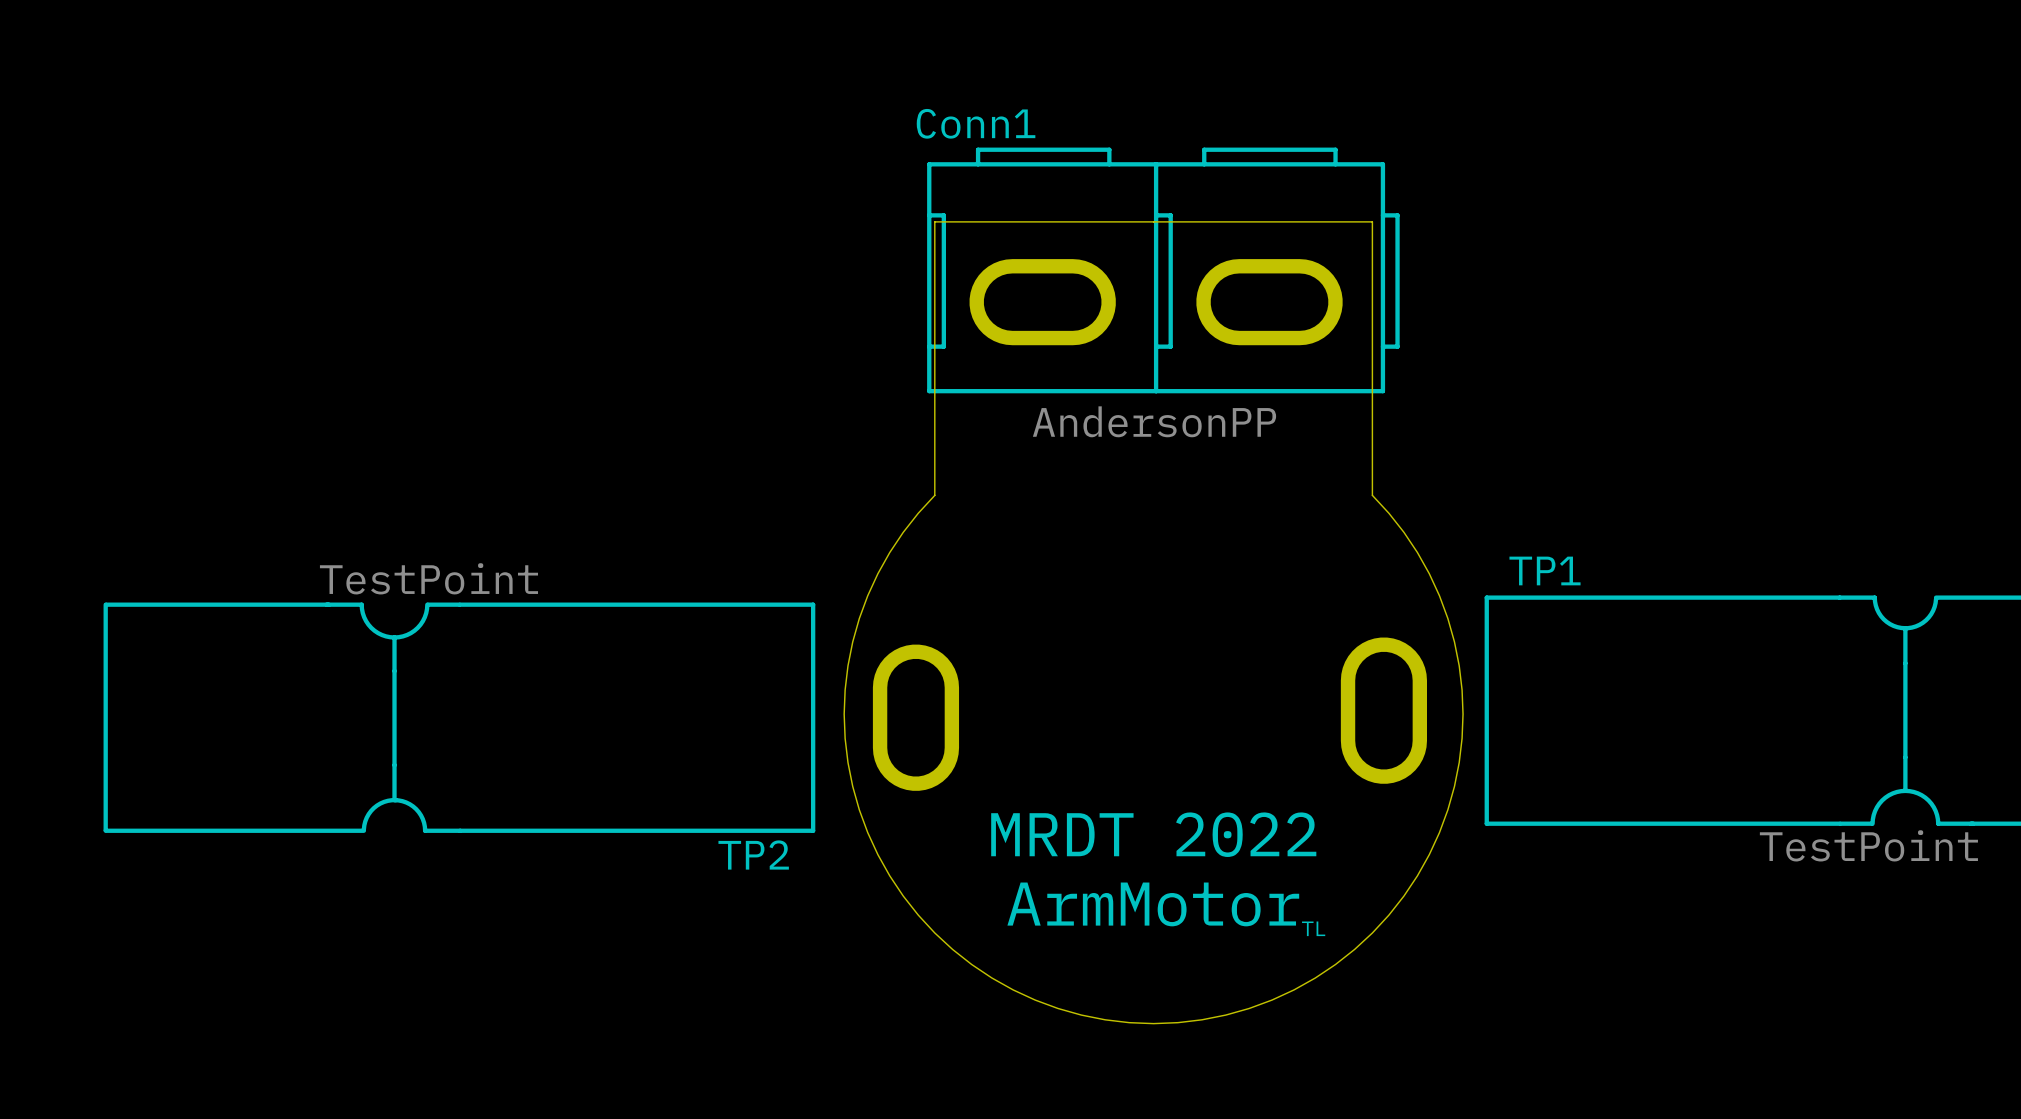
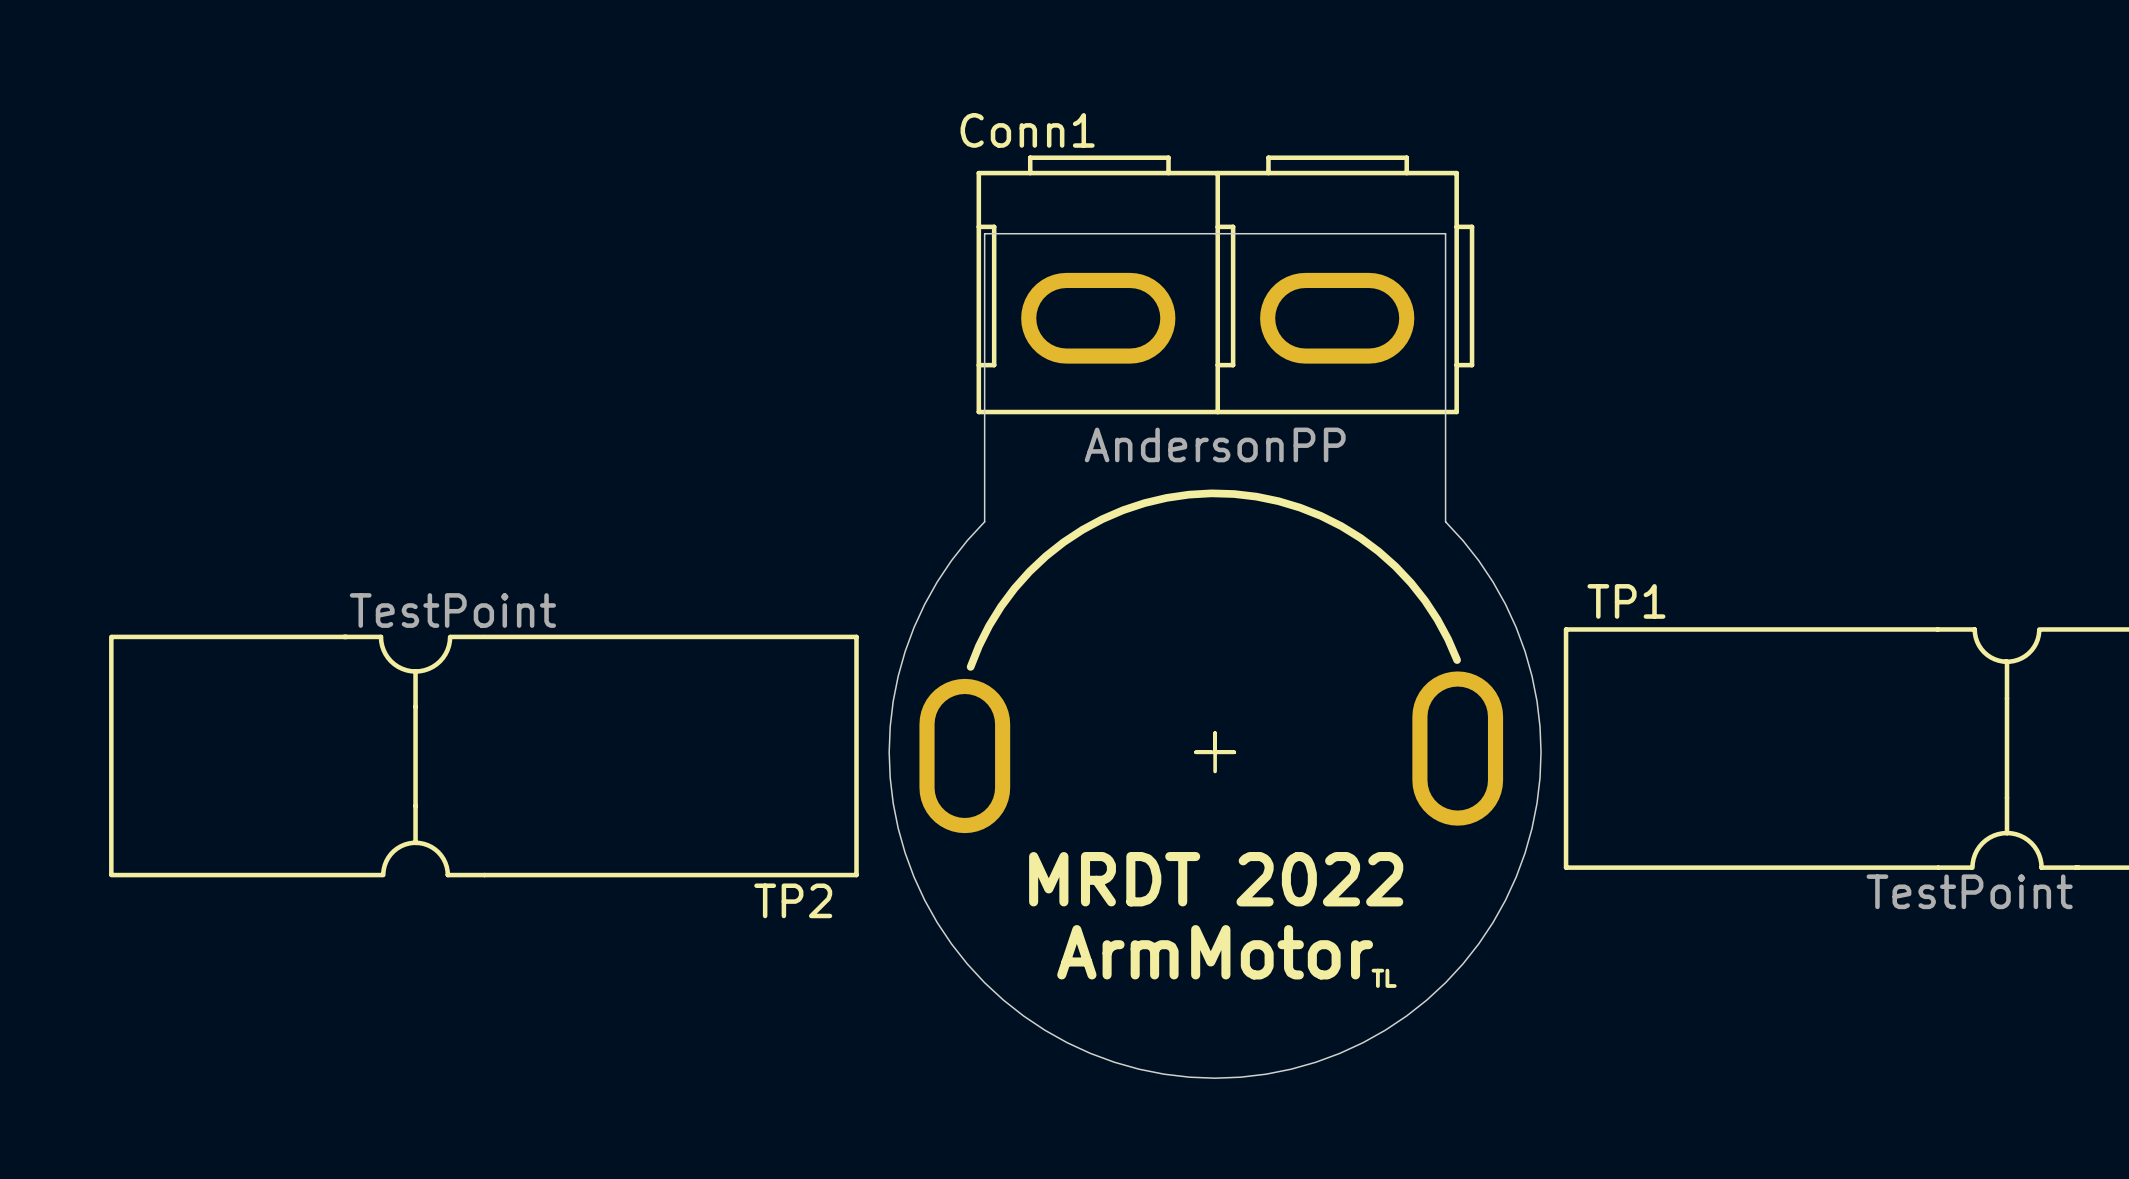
line: none -> (1457, 660) (1448, 639) (1425, 600) (1395, 566) (1360, 538) (1341, 526) (1300, 507) (1256, 496) (1211, 493) (1188, 494) (1144, 503) (1102, 519) (1063, 542) (1045, 556) (1014, 588) (989, 625) (970, 666)
line: none -> (1215, 733) (1215, 771)
line: none -> (1195, 752) (1234, 752)

